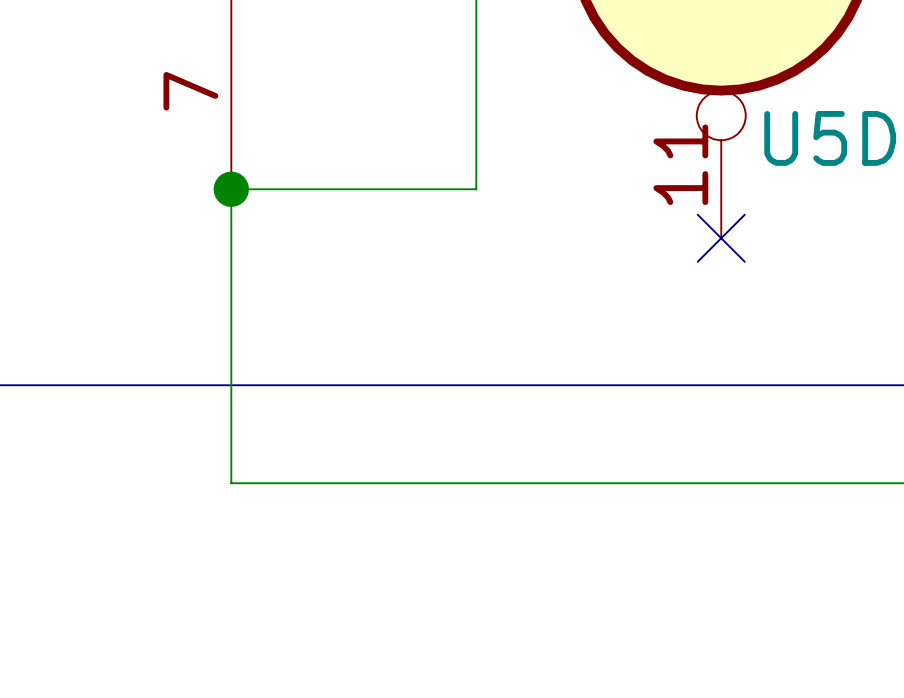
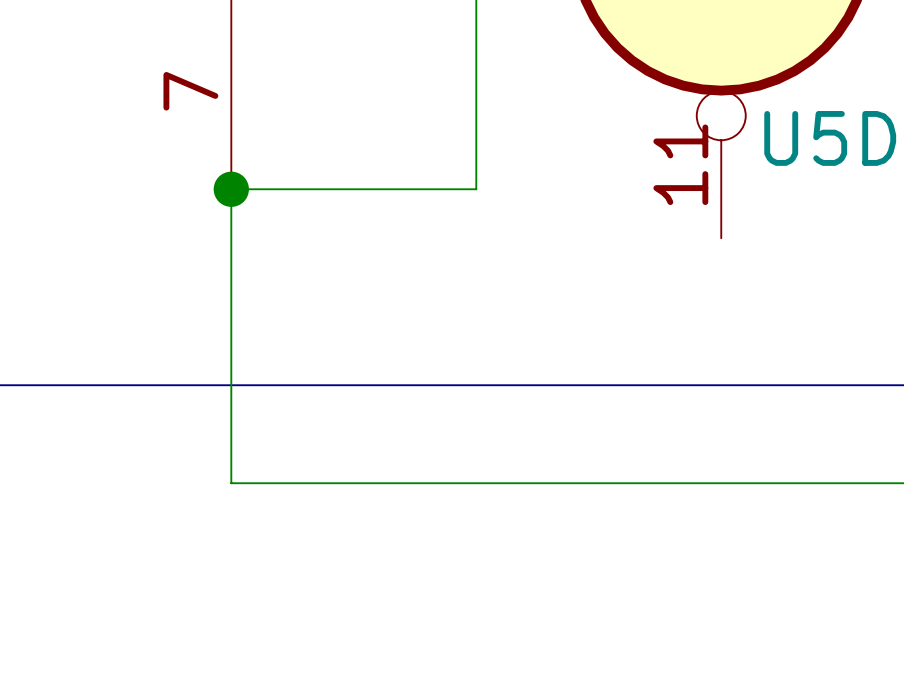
no-connect mark: (721, 238) -> none

